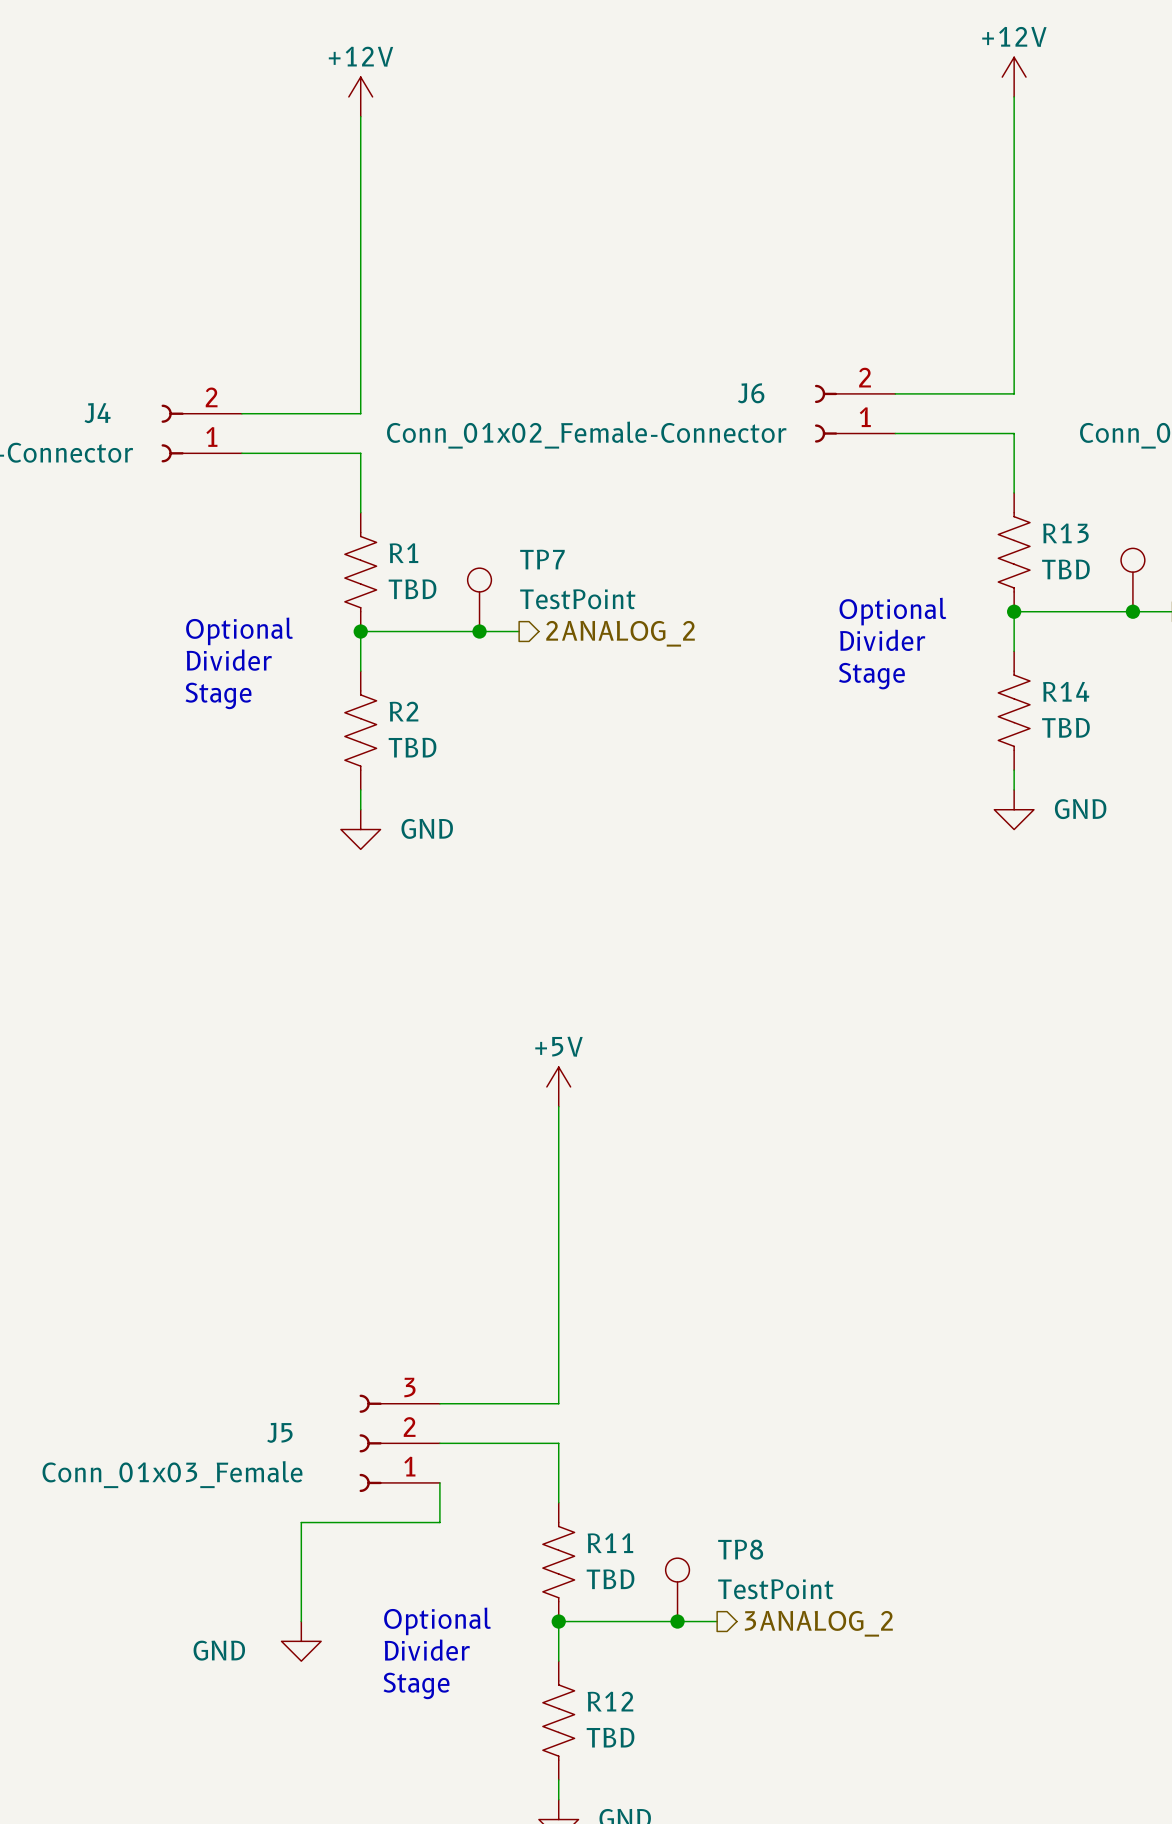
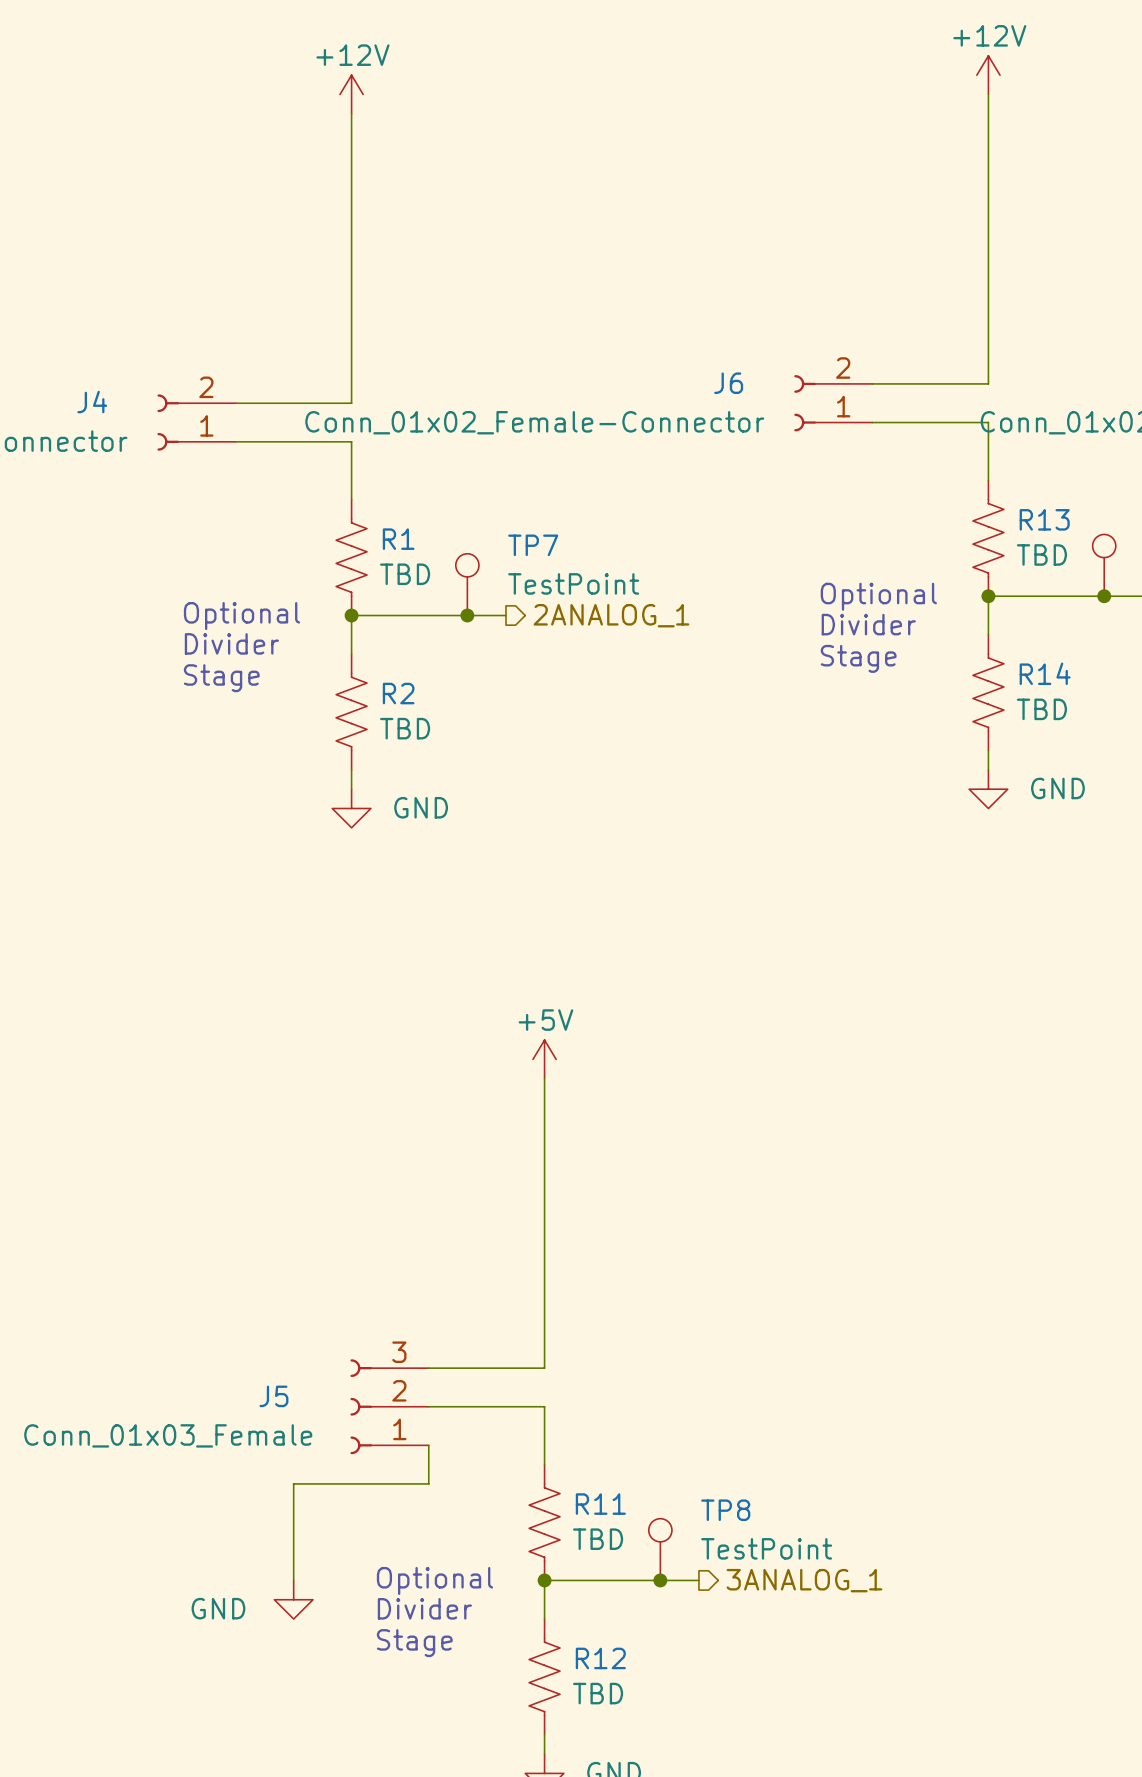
hierarchical label: 2ANALOG_2 (620, 633) -> 2ANALOG_1 (611, 615)
hierarchical label: 3ANALOG_2 (818, 1623) -> 3ANALOG_1 (804, 1580)

